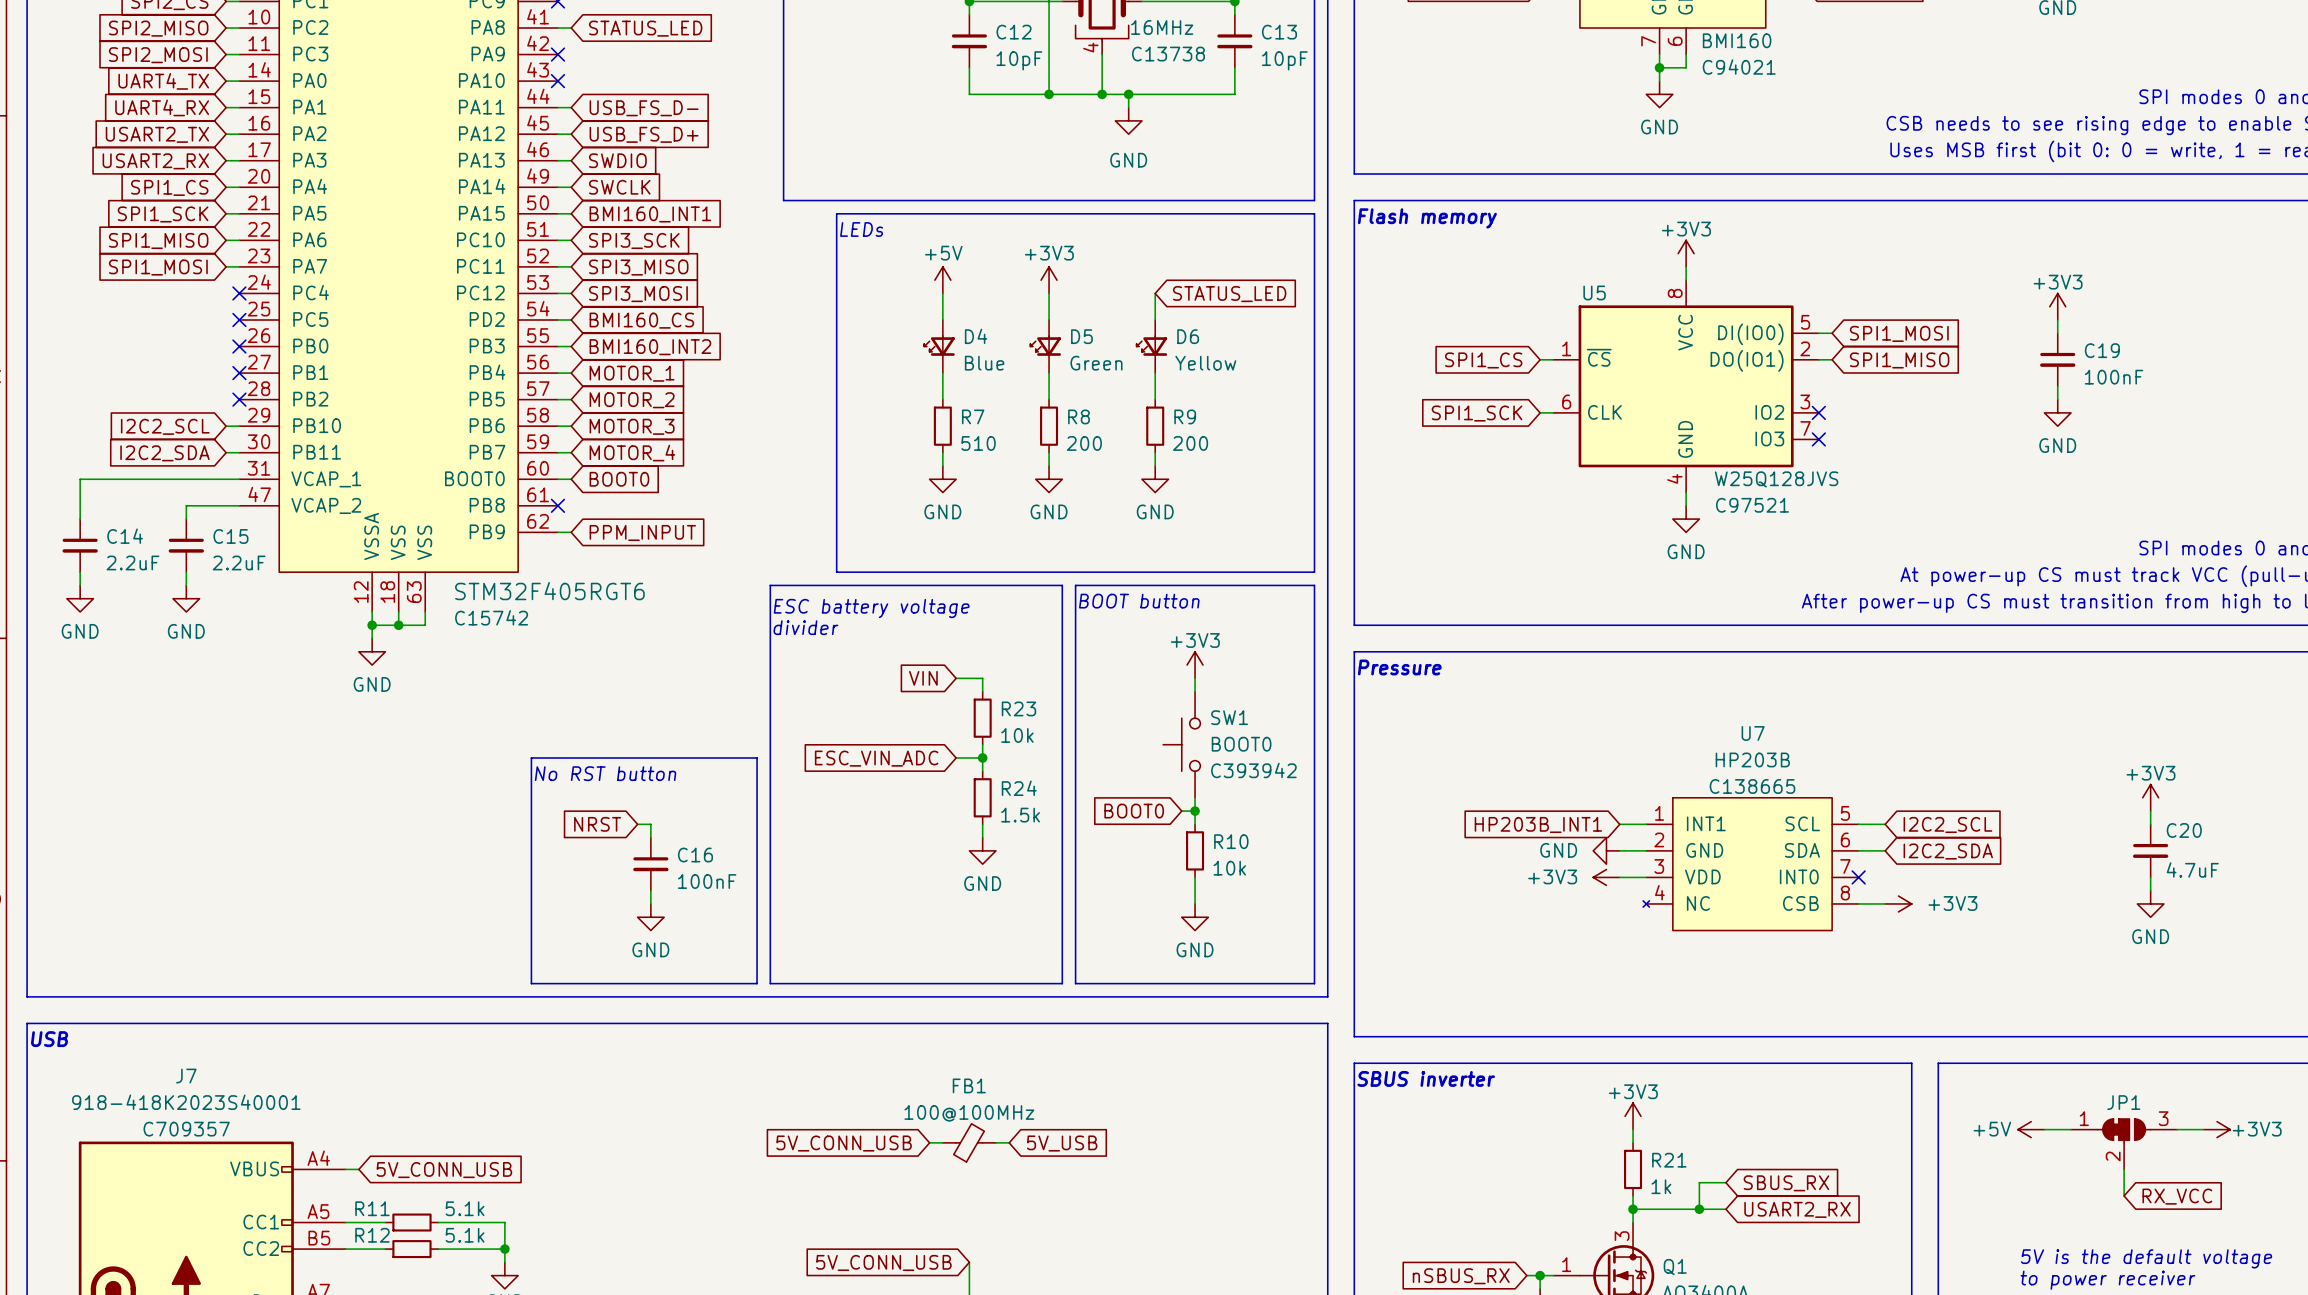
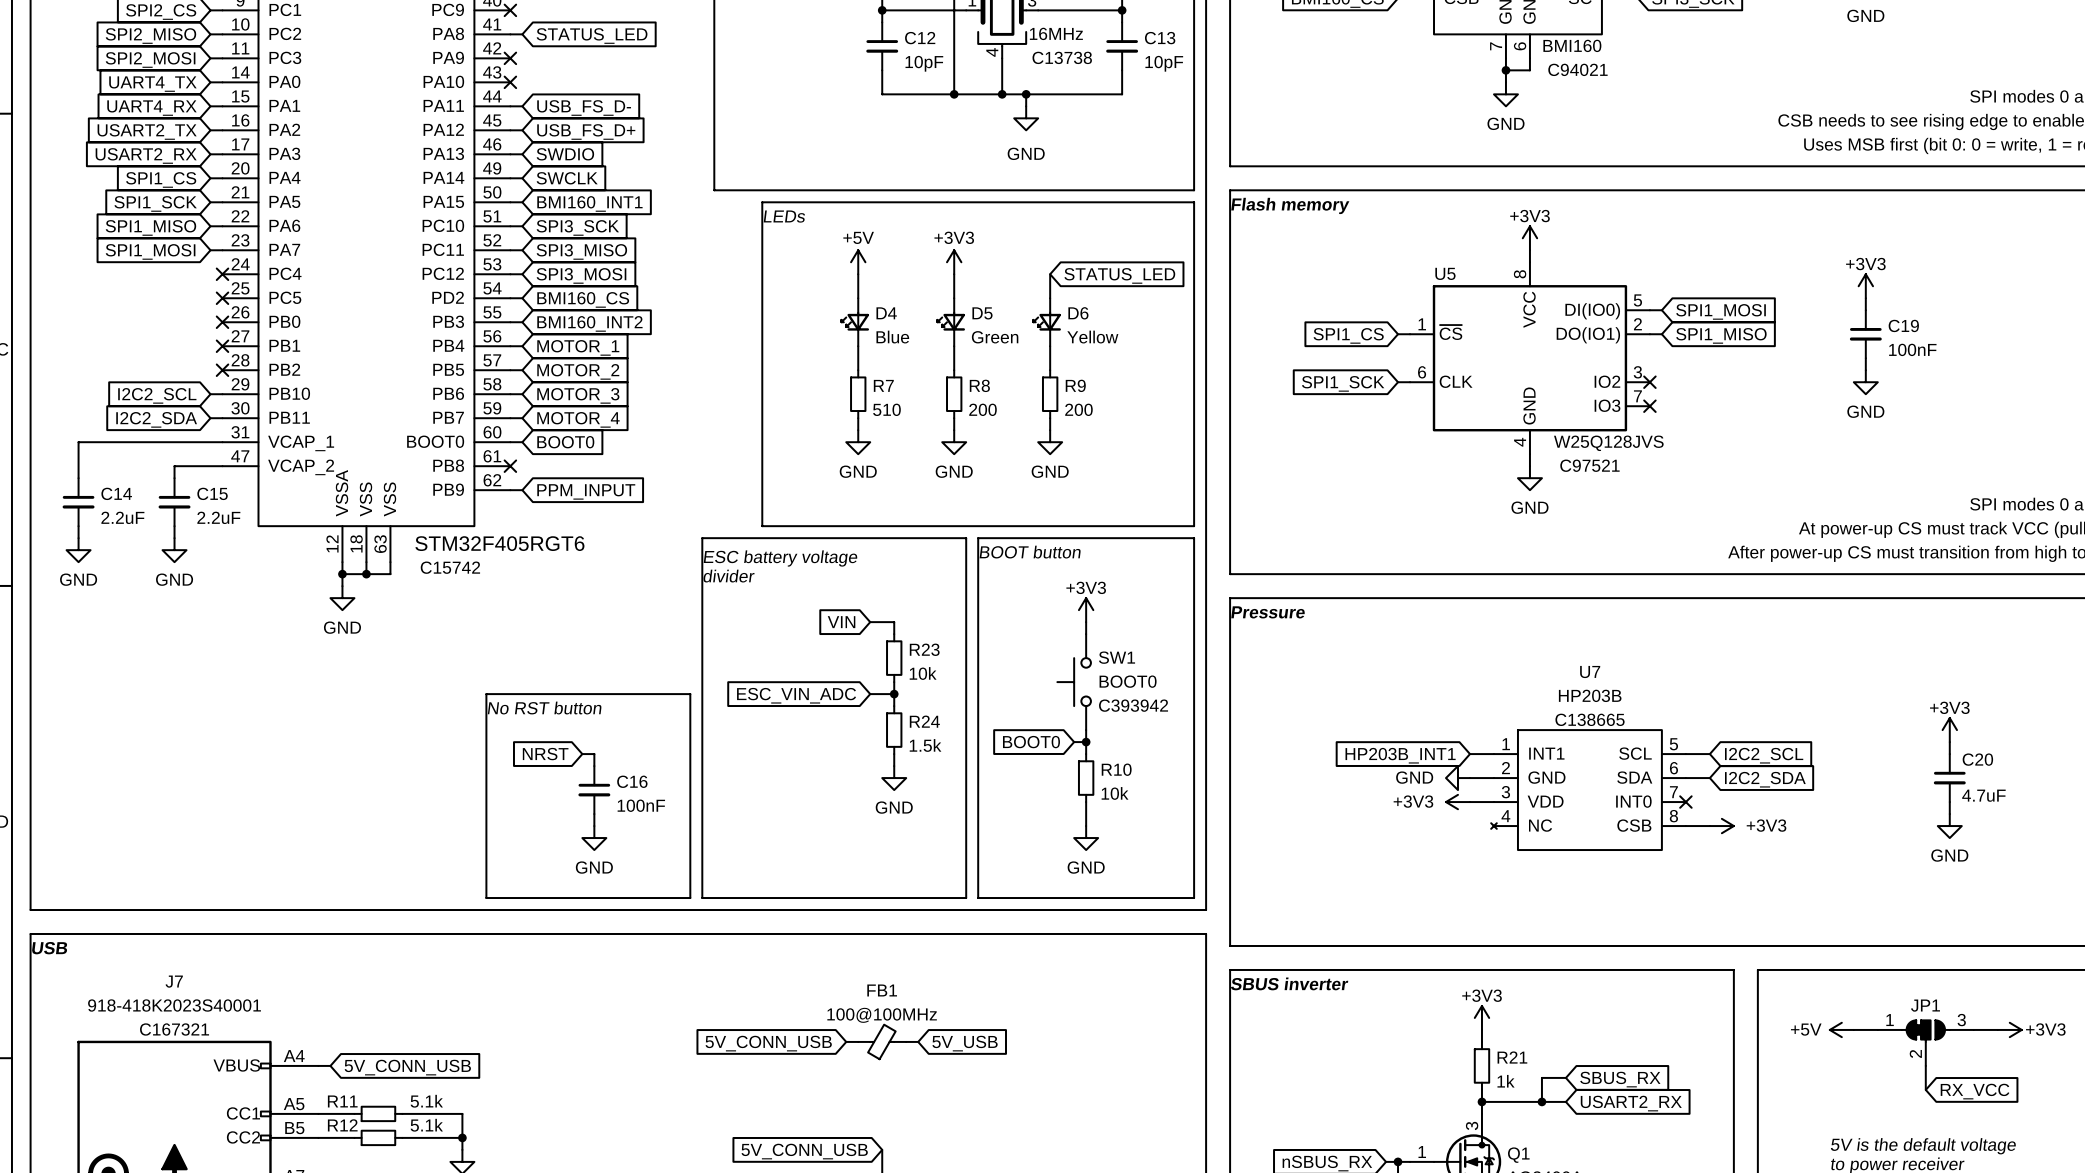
J7 text: C709357 (186, 1129) -> C167321 (174, 1029)

